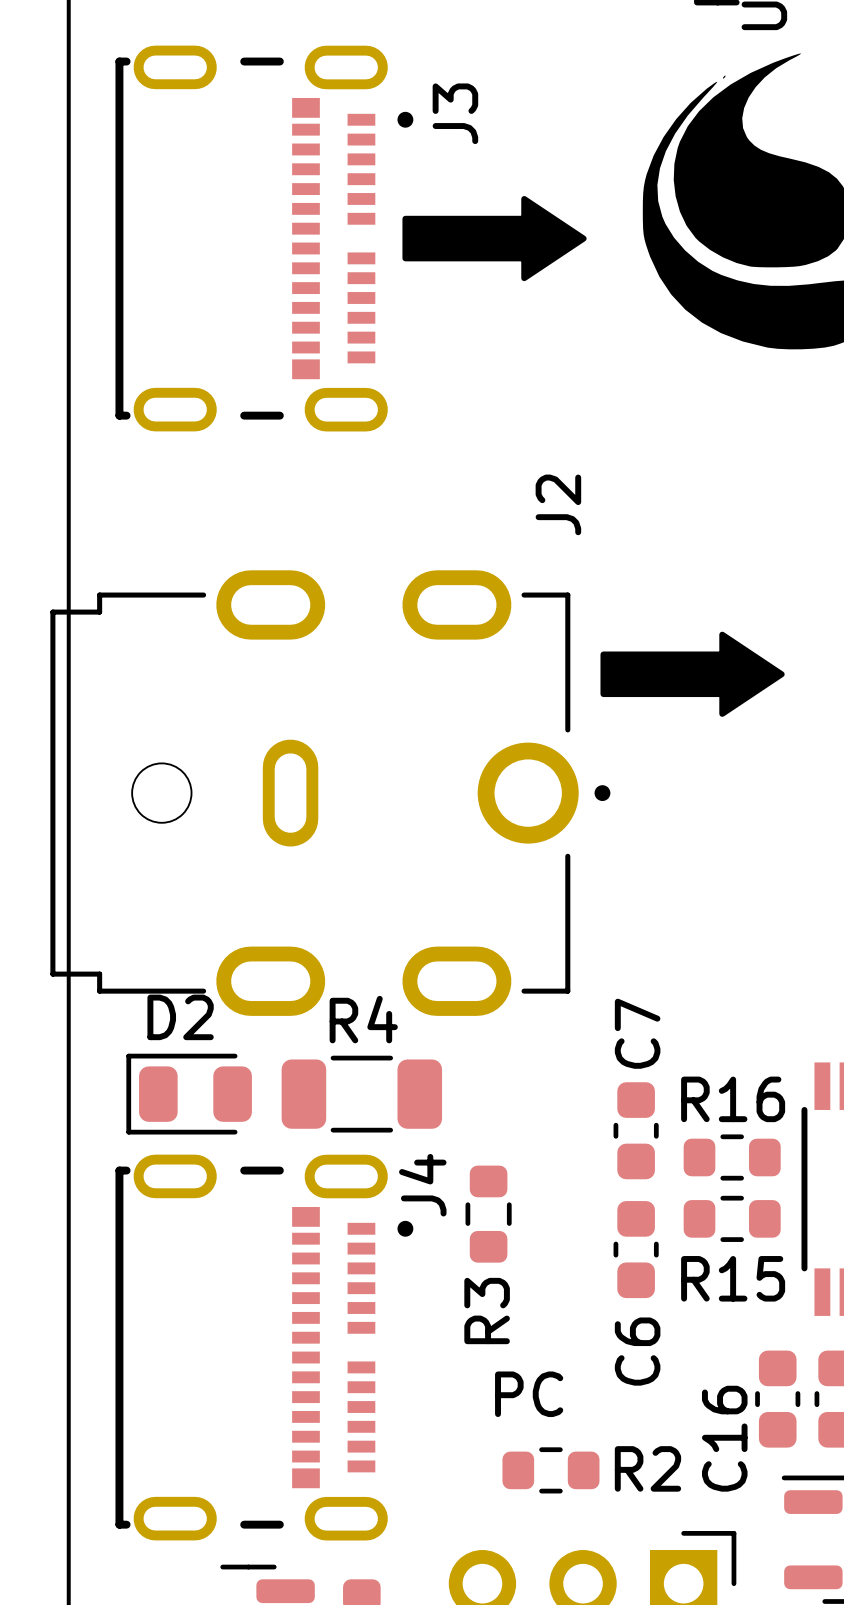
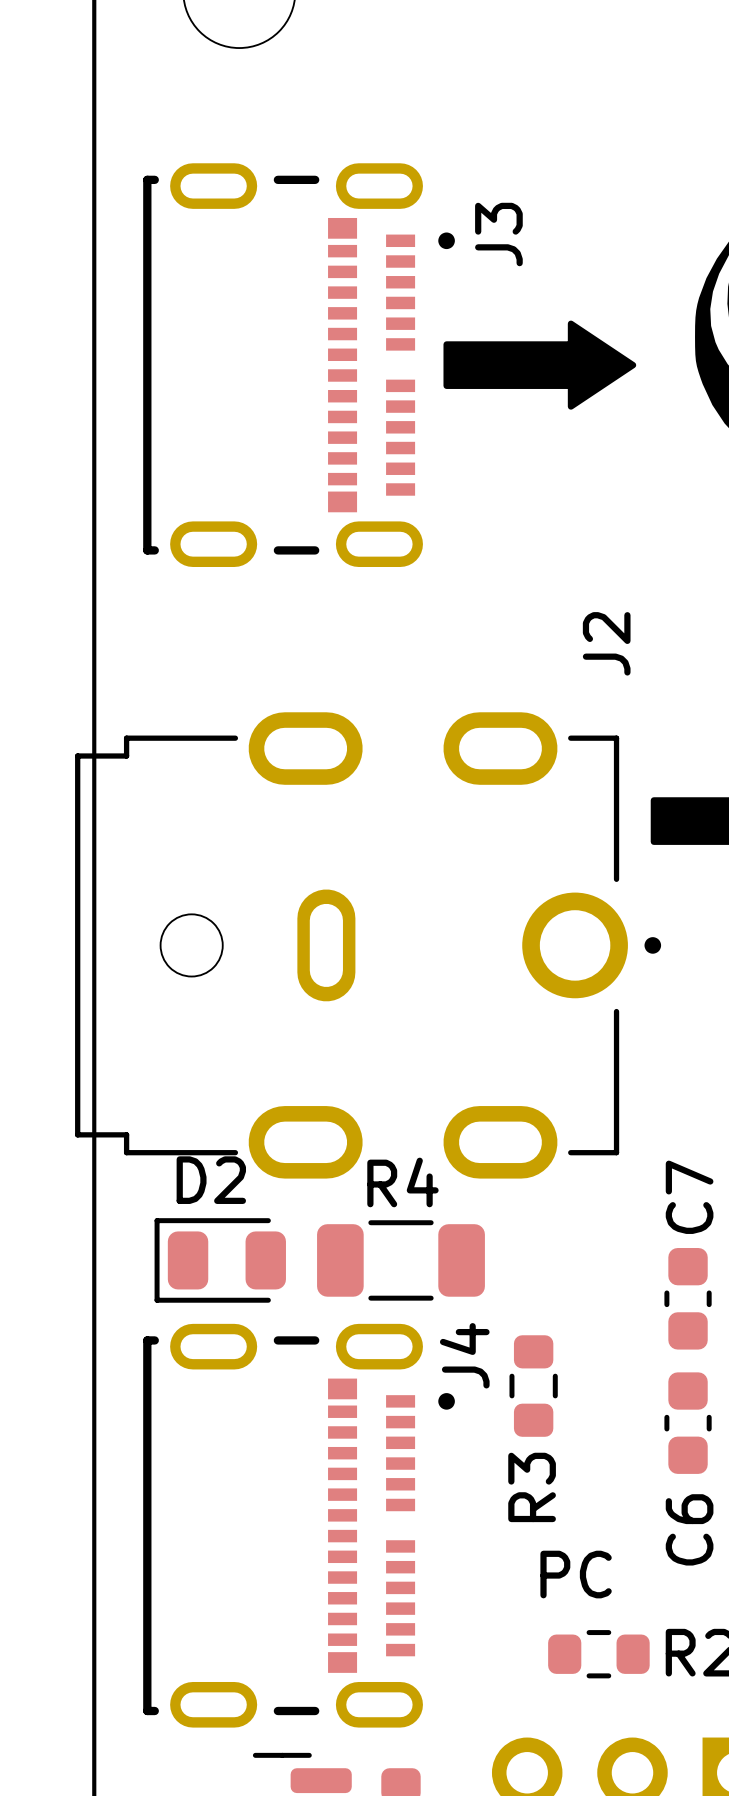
J3 footprint: [115, 45, 414, 432] -> [143, 163, 455, 567]
J4 footprint: [115, 1154, 414, 1541] -> [143, 1323, 455, 1728]

